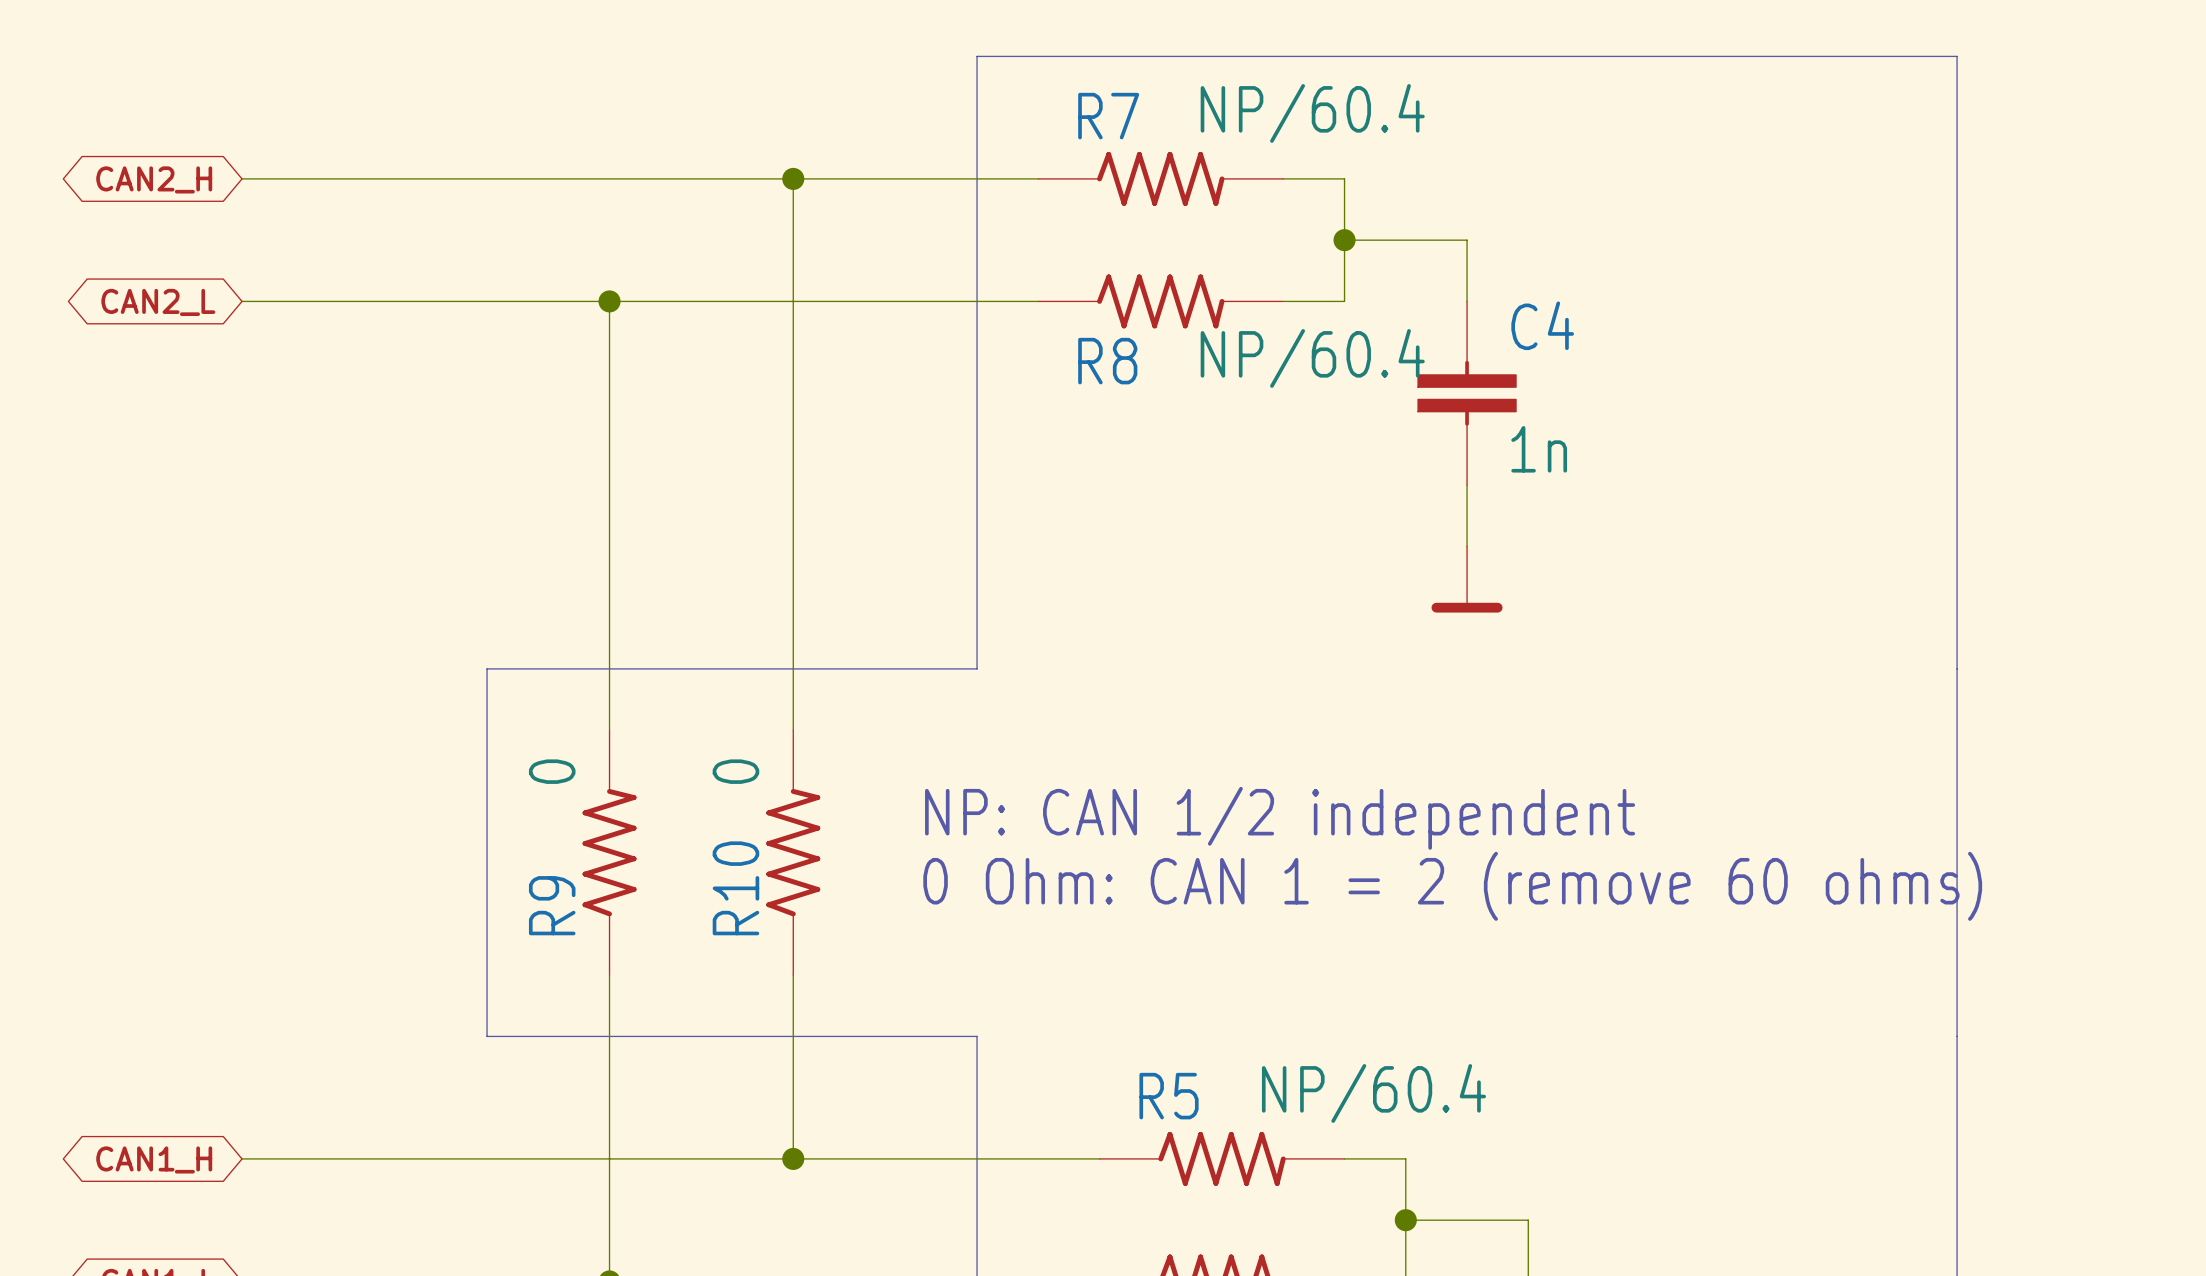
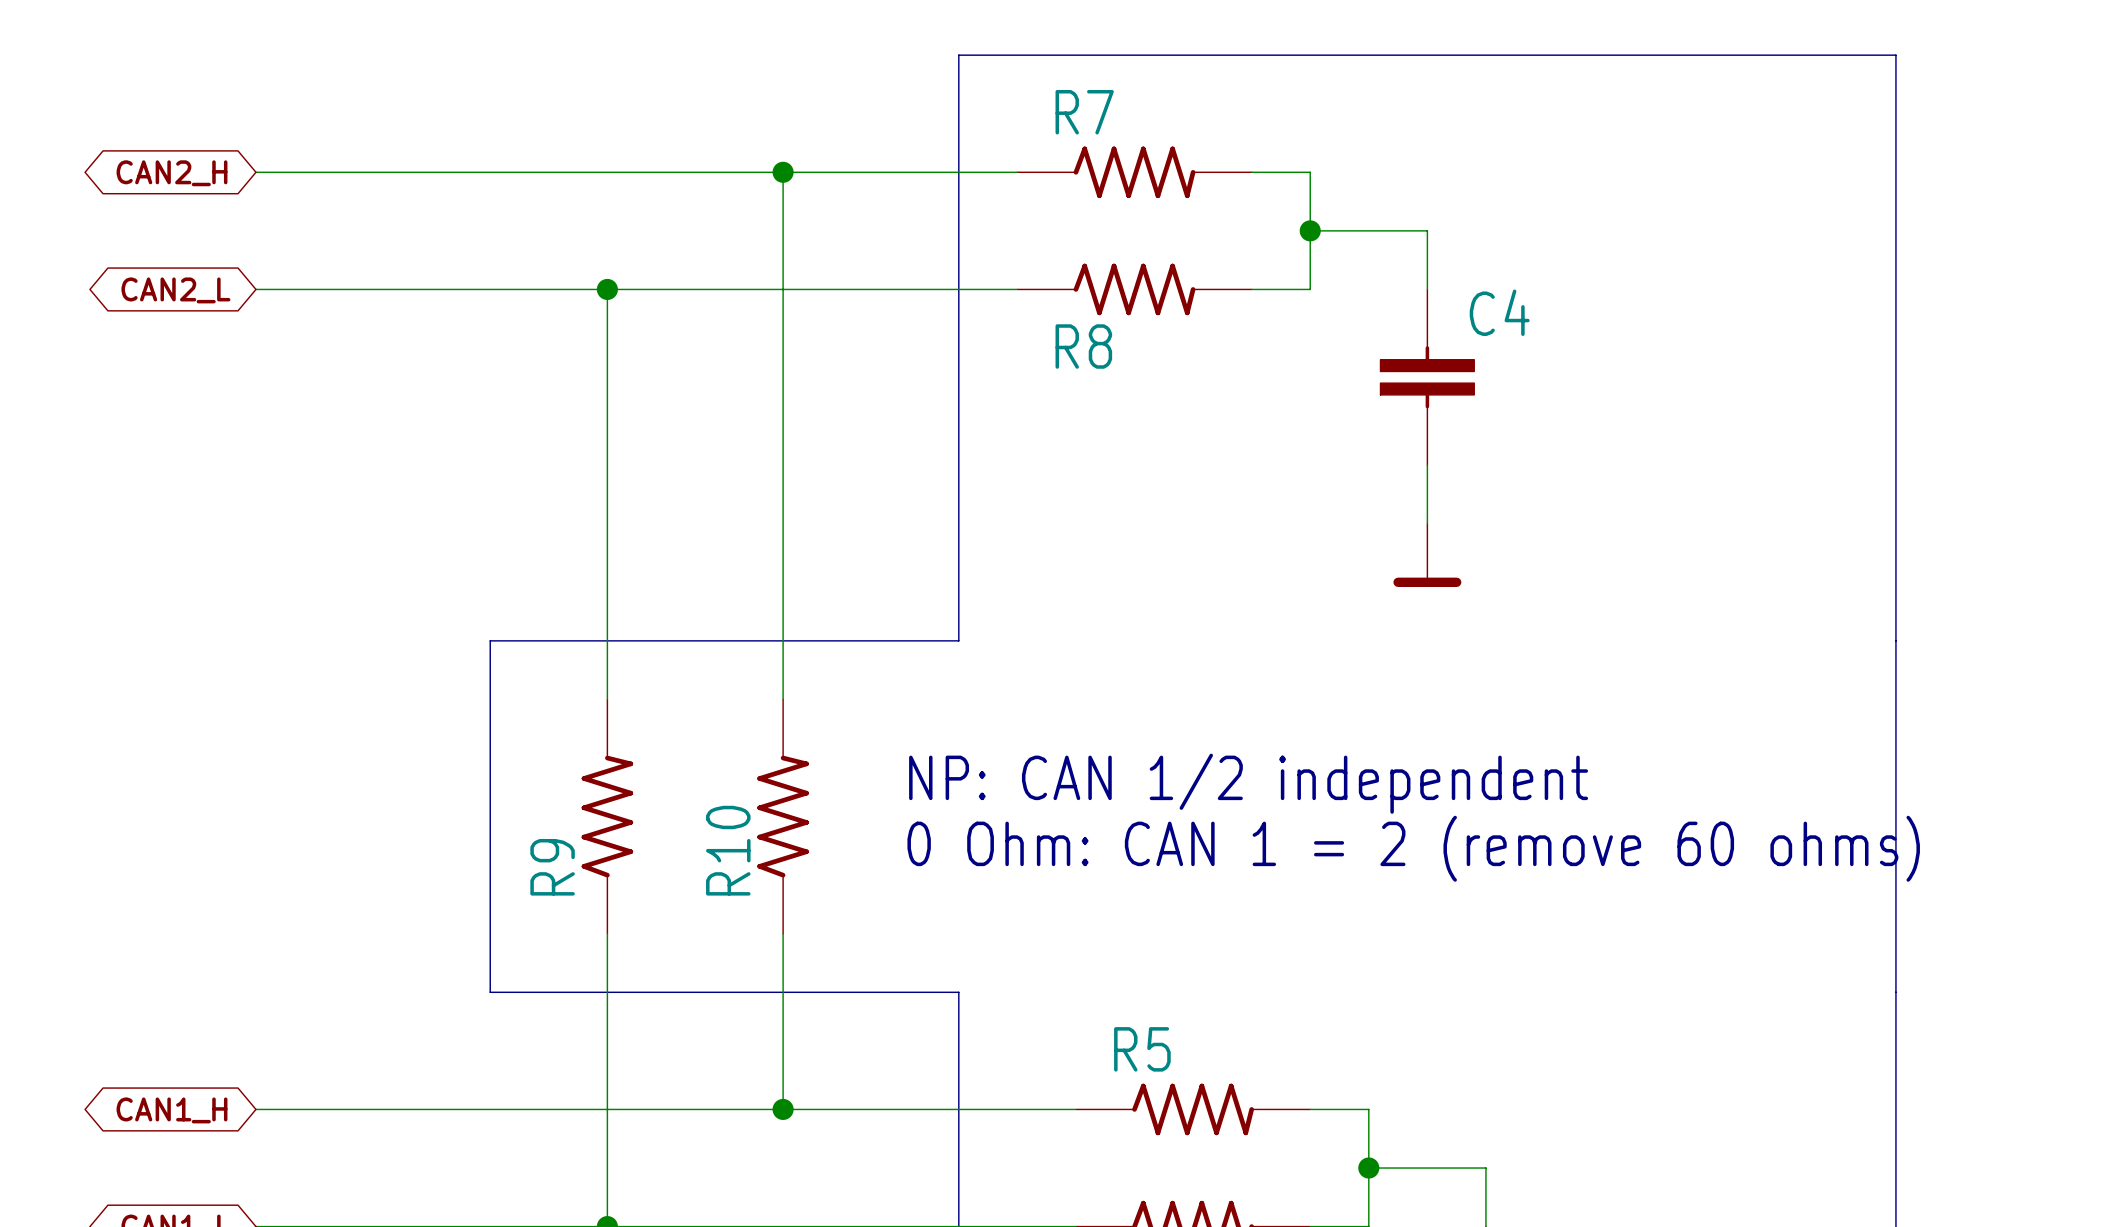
R7 value: NP/60.4 (1312, 113) -> none
R8 value: NP/60.4 (1312, 358) -> none
C4 value: 1n (1539, 449) -> none
R9 value: 0 (552, 771) -> none
R10 value: 0 (735, 771) -> none
R5 value: NP/60.4 (1373, 1093) -> none

